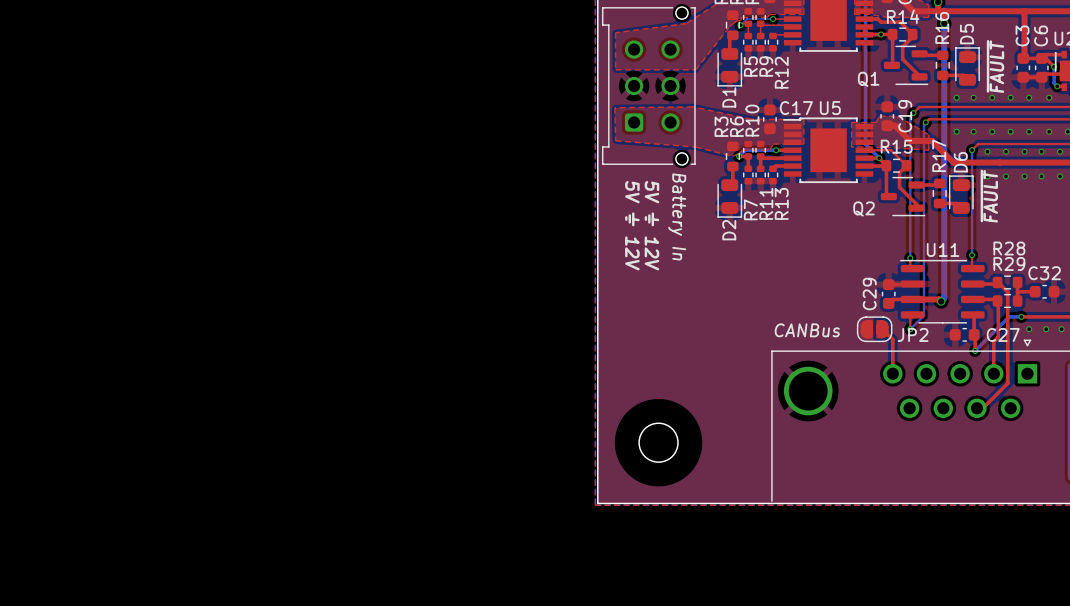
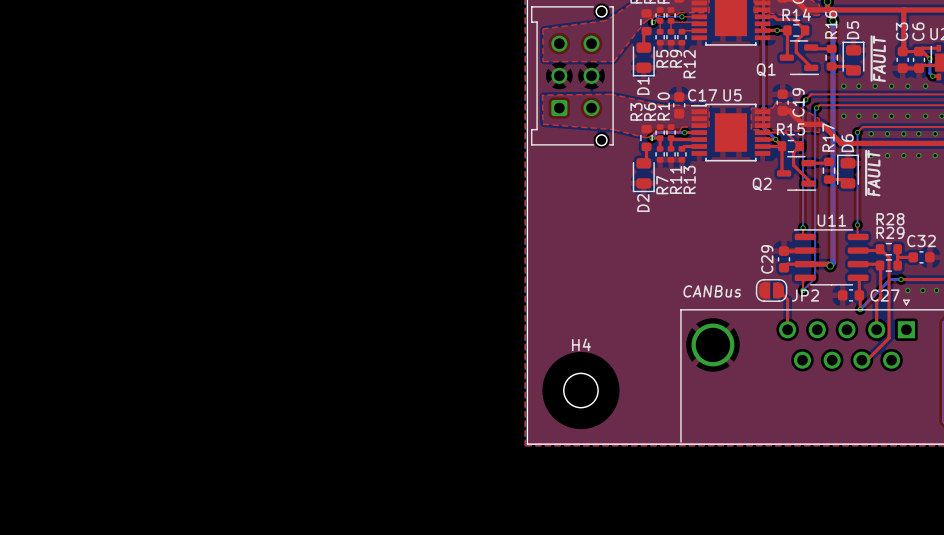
text: Battery In (677, 216) -> none
text: 5V ⏚ 12V (632, 225) -> none
text: 5V ⏚ 12V (651, 225) -> none
H4 name: none -> H4 (581, 344)

